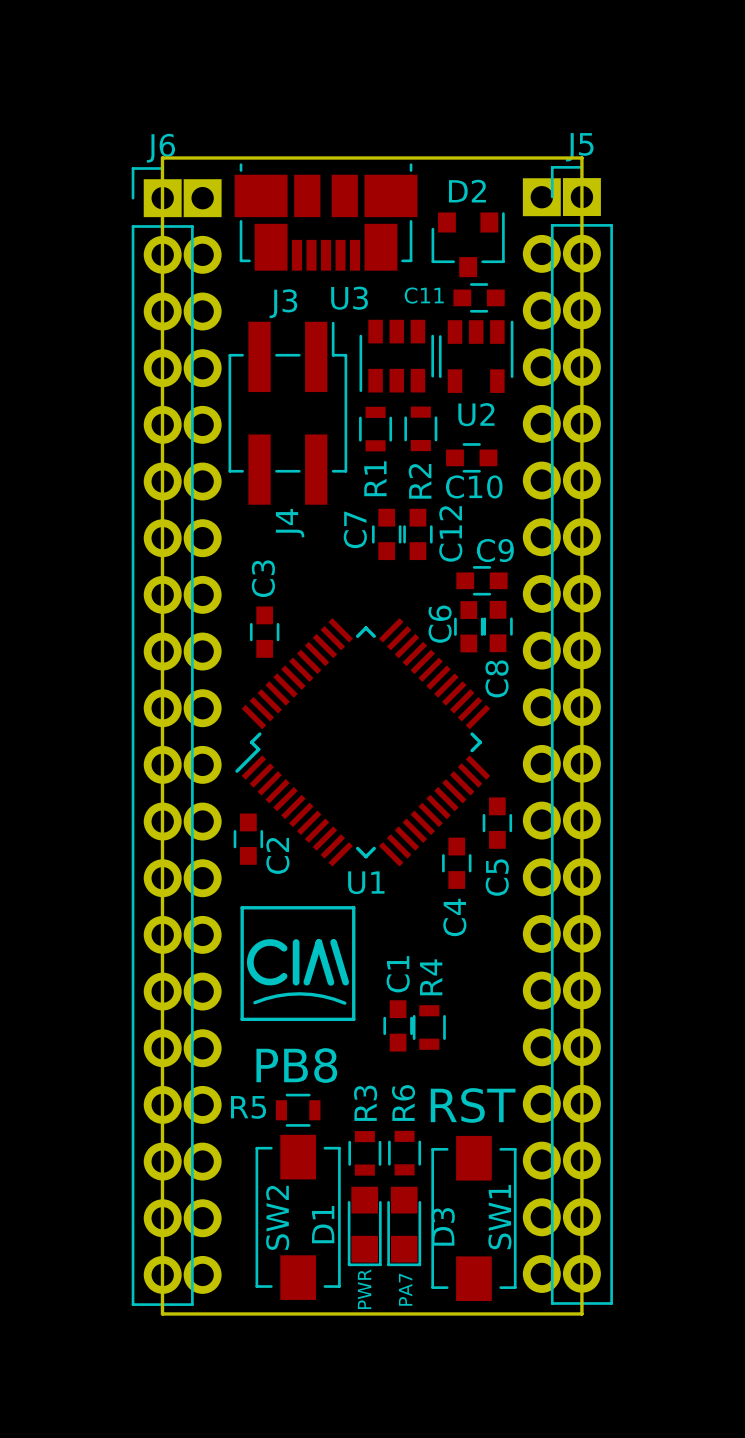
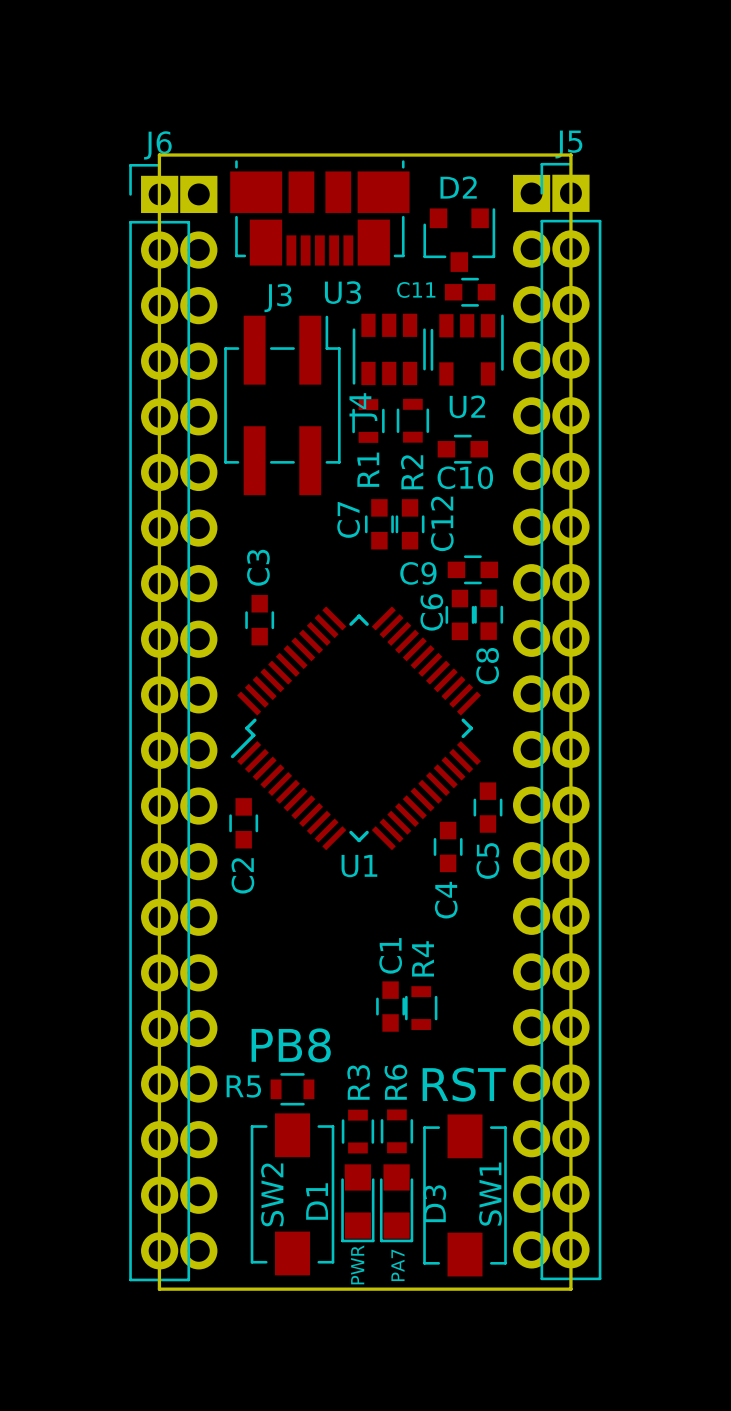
J4 name position: J4 (290, 523) -> J4 (363, 407)
C9 name position: C9 (495, 550) -> C9 (418, 573)
C2 name position: C2 (277, 855) -> C2 (242, 875)
line: (242, 907) (242, 1019) (353, 1019) (353, 907) (242, 907) -> none
line: (296, 942) (296, 982) -> none
line: (333, 942) (345, 982) -> none
line: (284, 948) (272, 942) (262, 943) (252, 952) (250, 962) (254, 974) (262, 980) (272, 981) (284, 976) -> none
line: (306, 982) (318, 942) (330, 982) -> none
line: (254, 1002) (276, 996) (299, 993) (322, 996) (344, 1003) -> none

